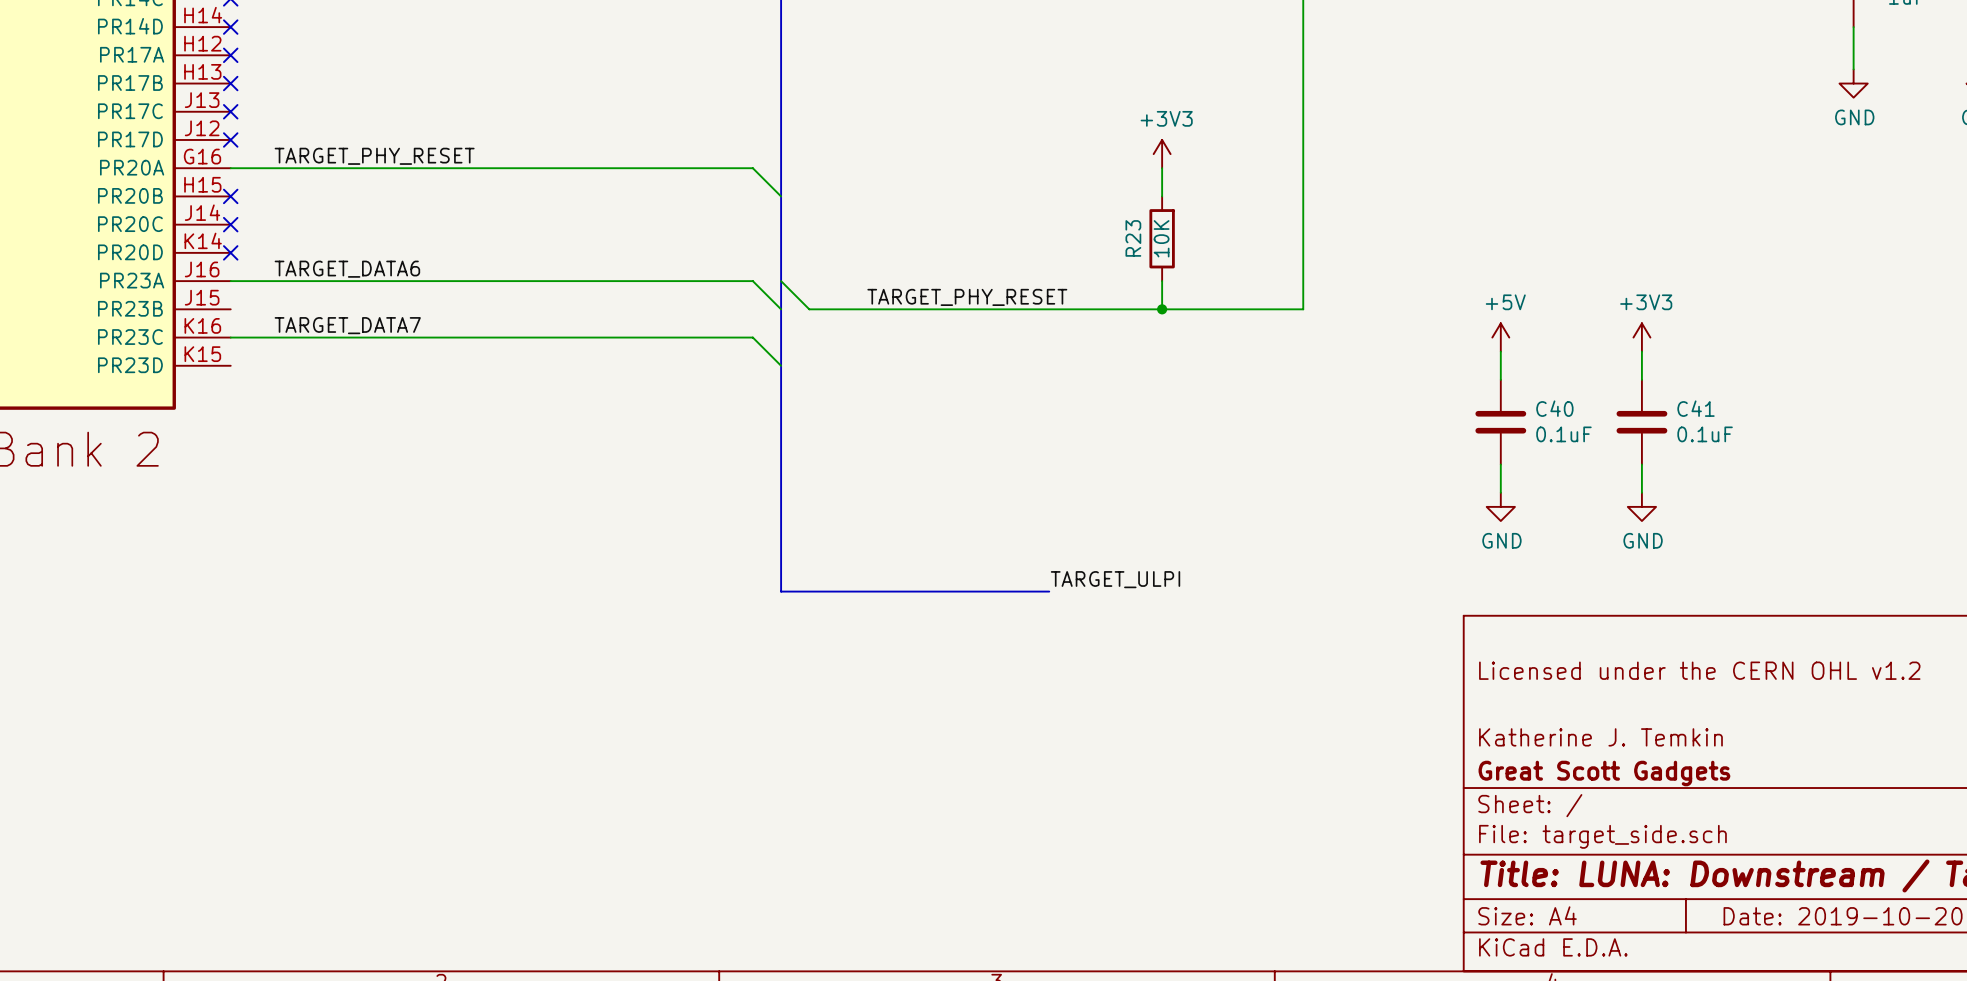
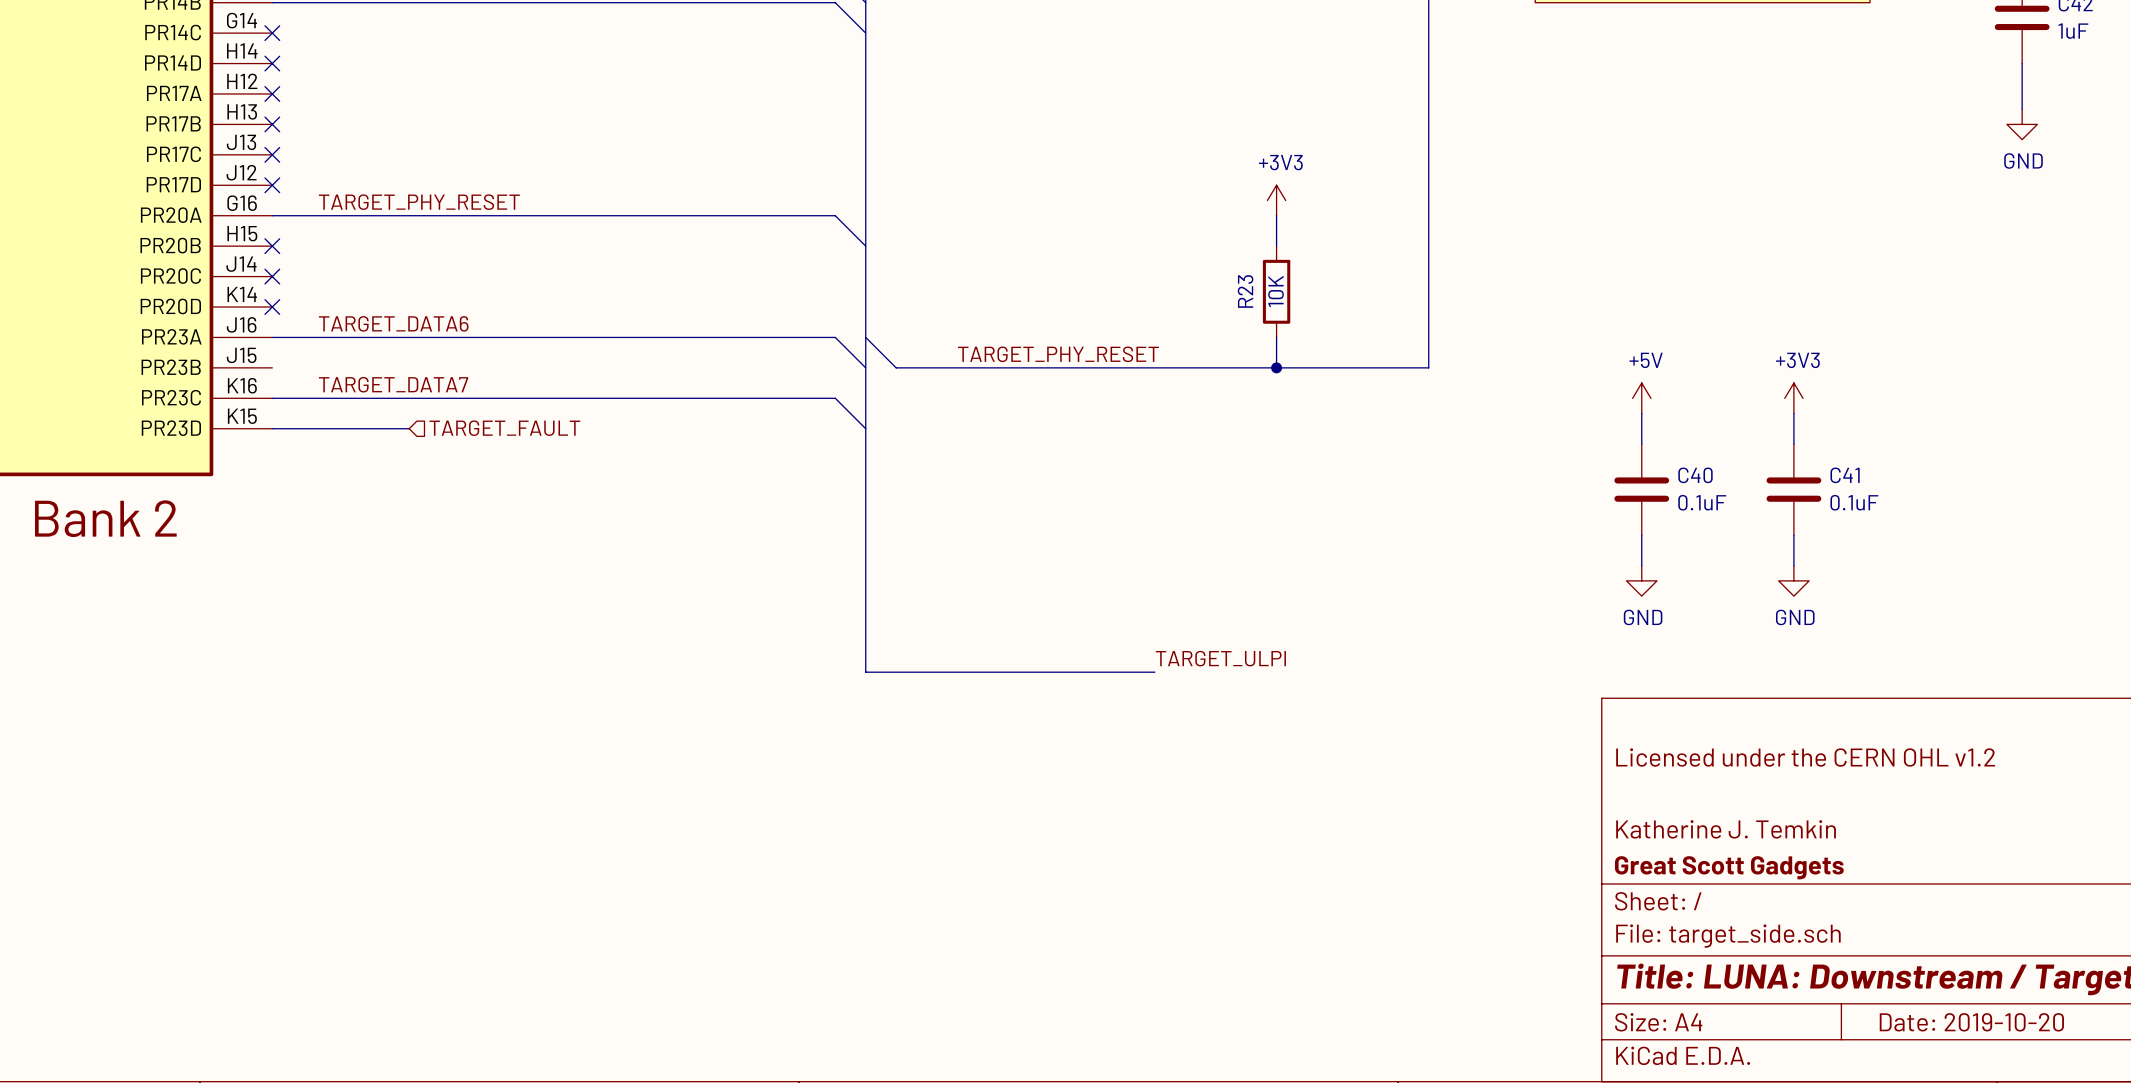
wire: none -> (272, 428) (409, 428)
hierarchical label: none -> TARGET_FAULT (504, 428)

